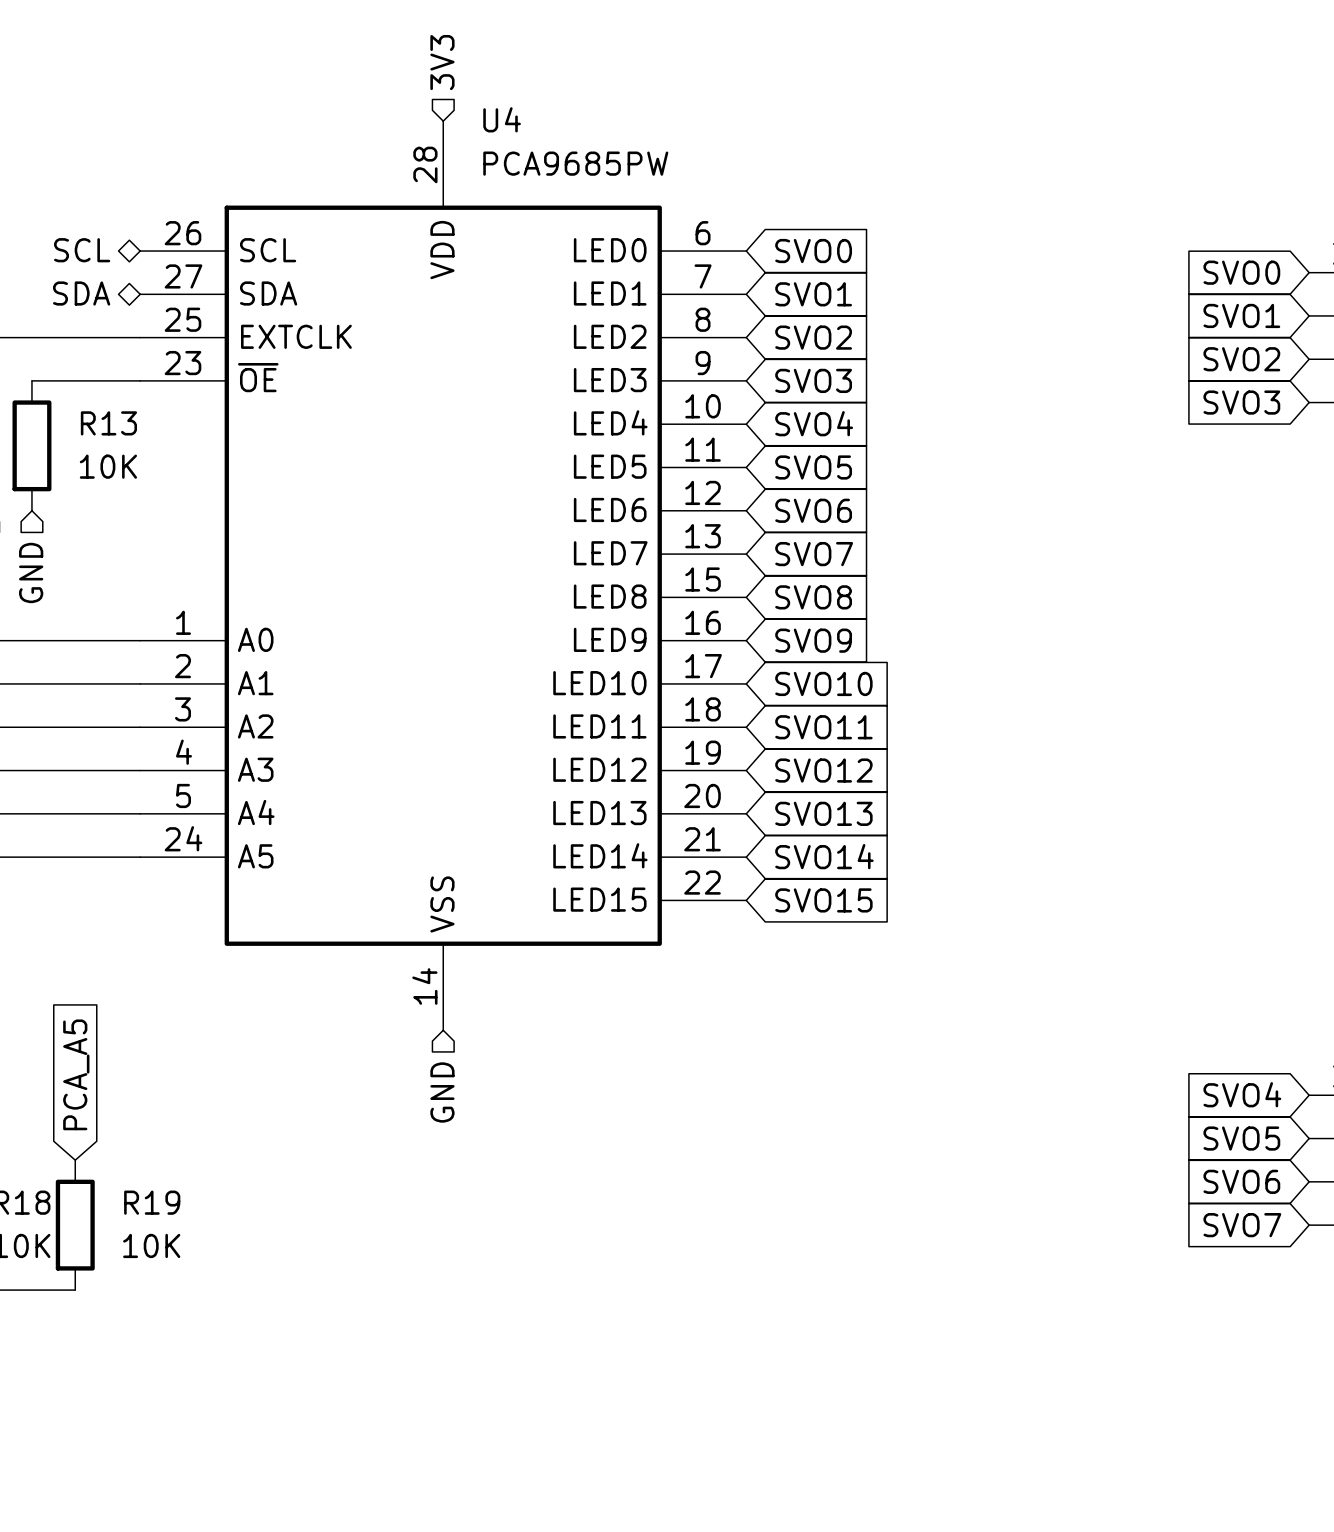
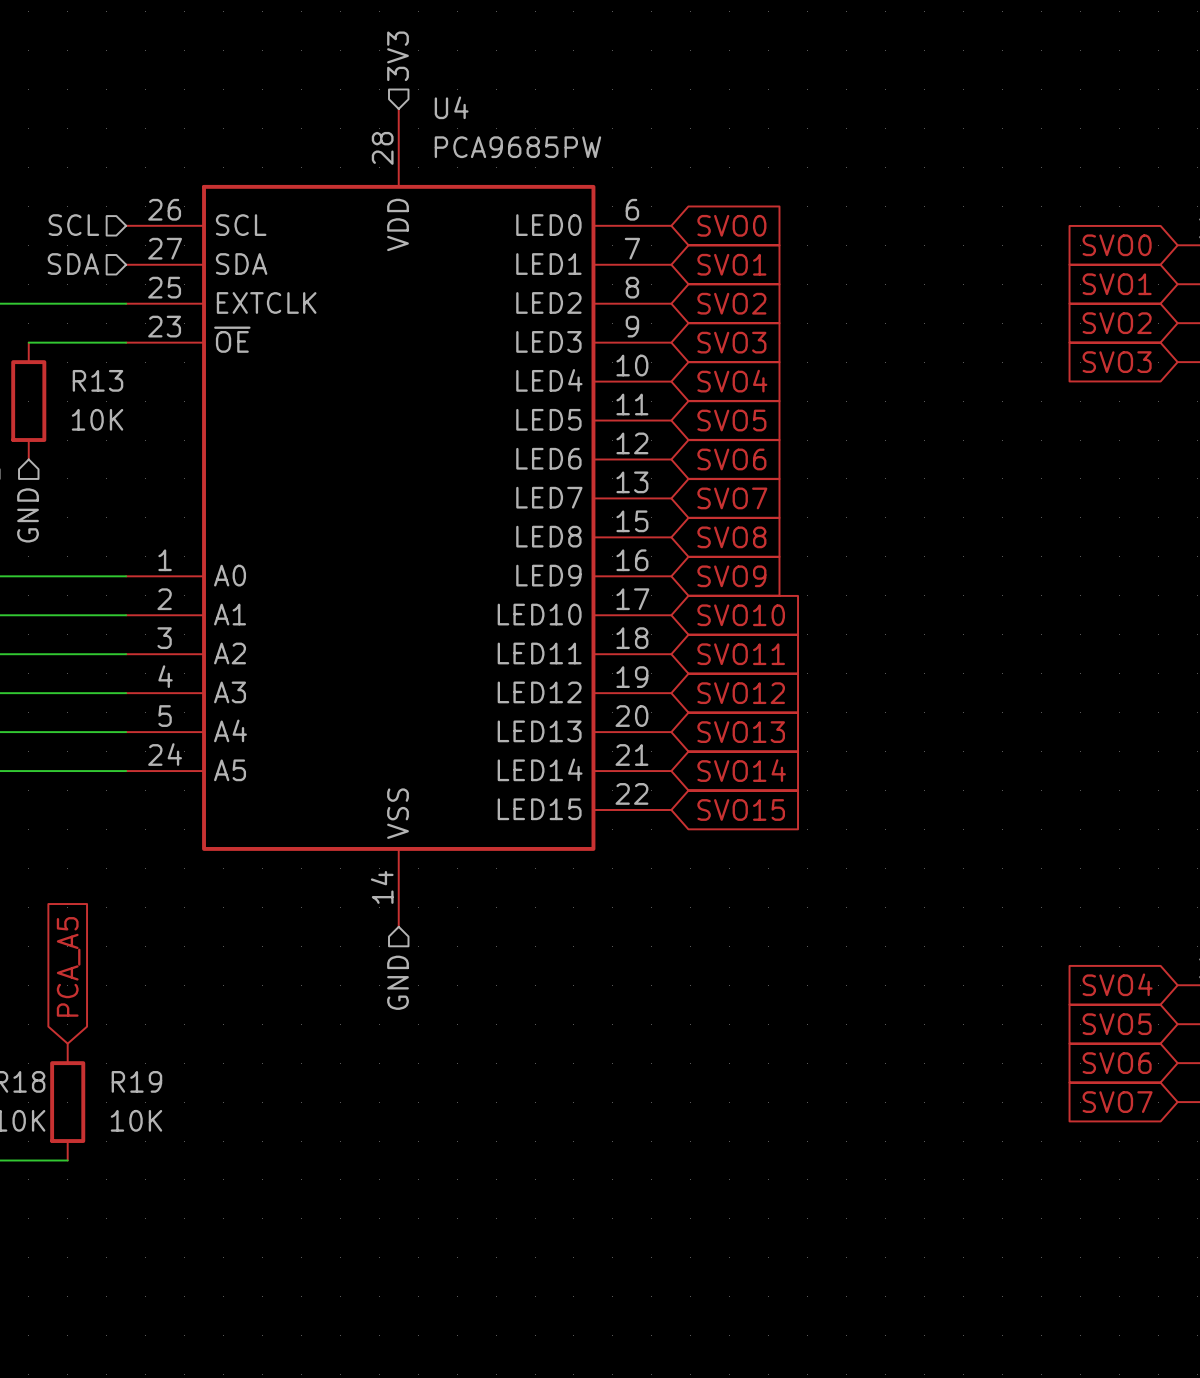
hierarchical label shape: bidirectional (82, 250) -> input (73, 225)
hierarchical label shape: bidirectional (81, 293) -> input (73, 264)

